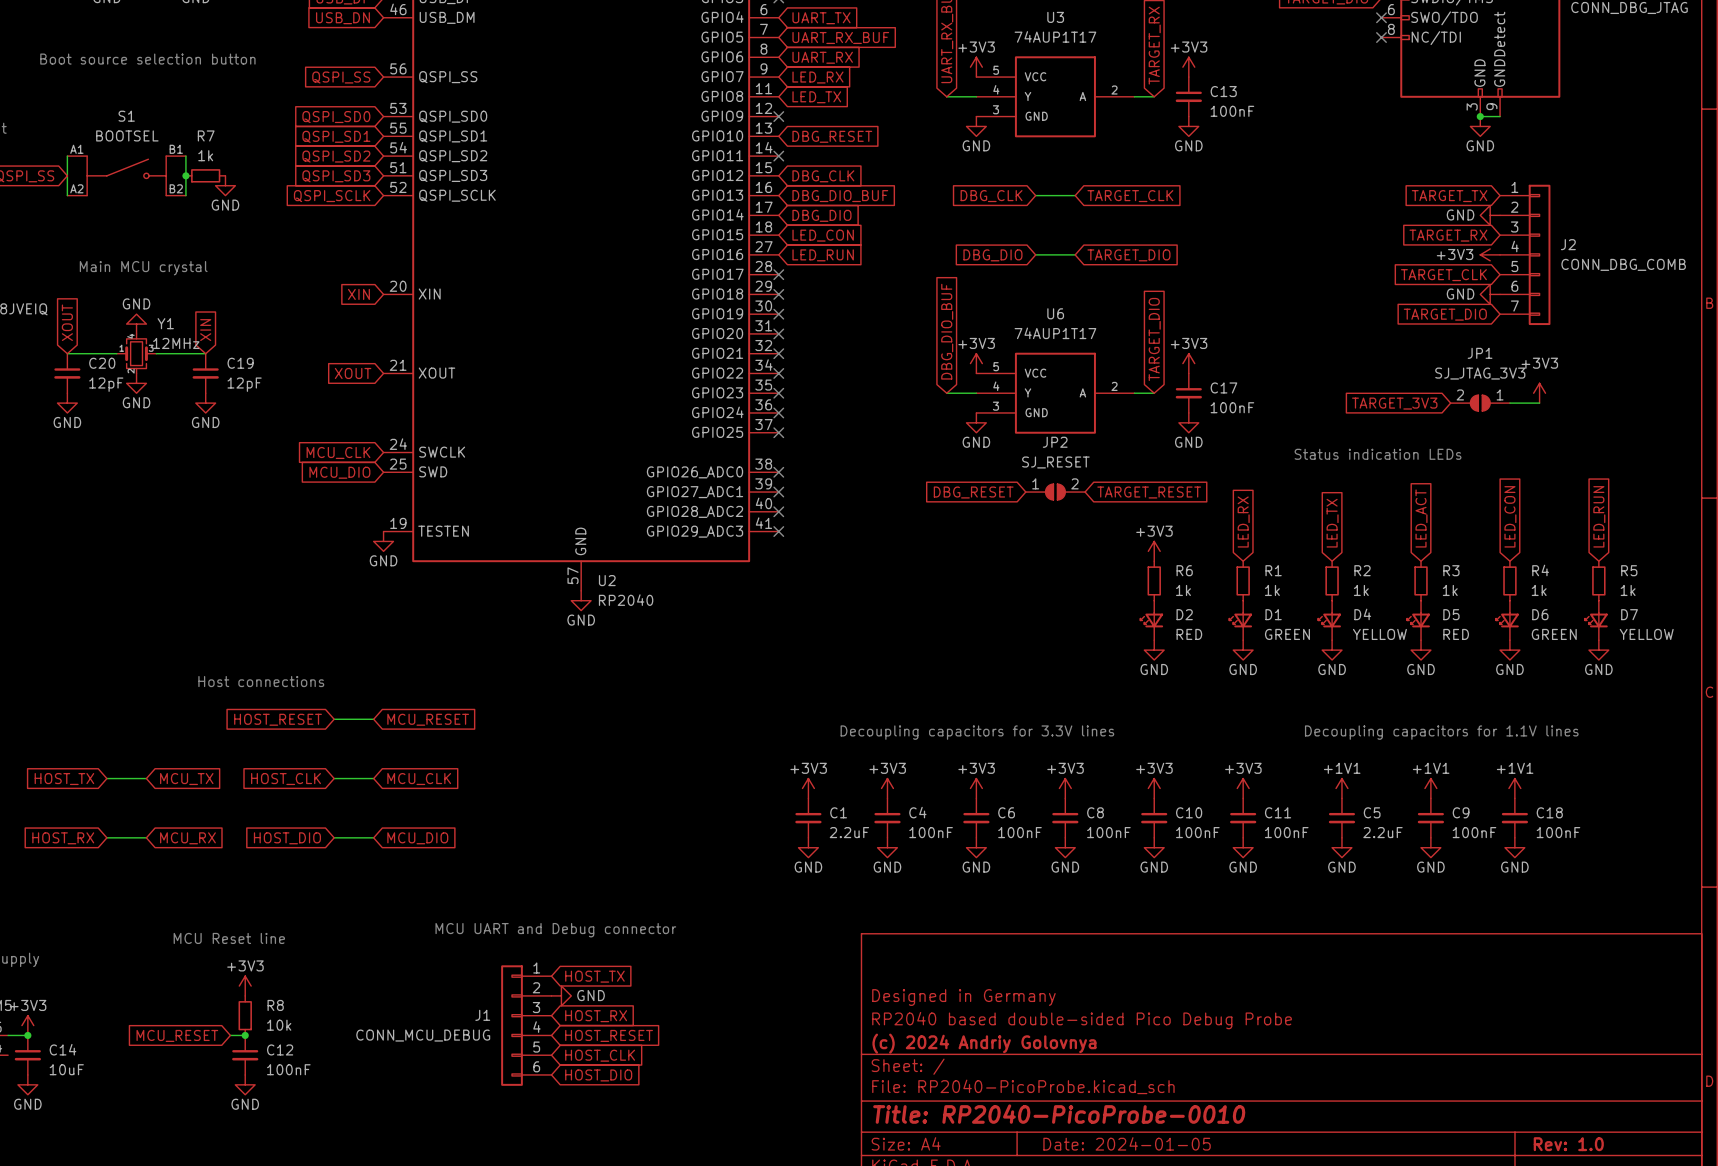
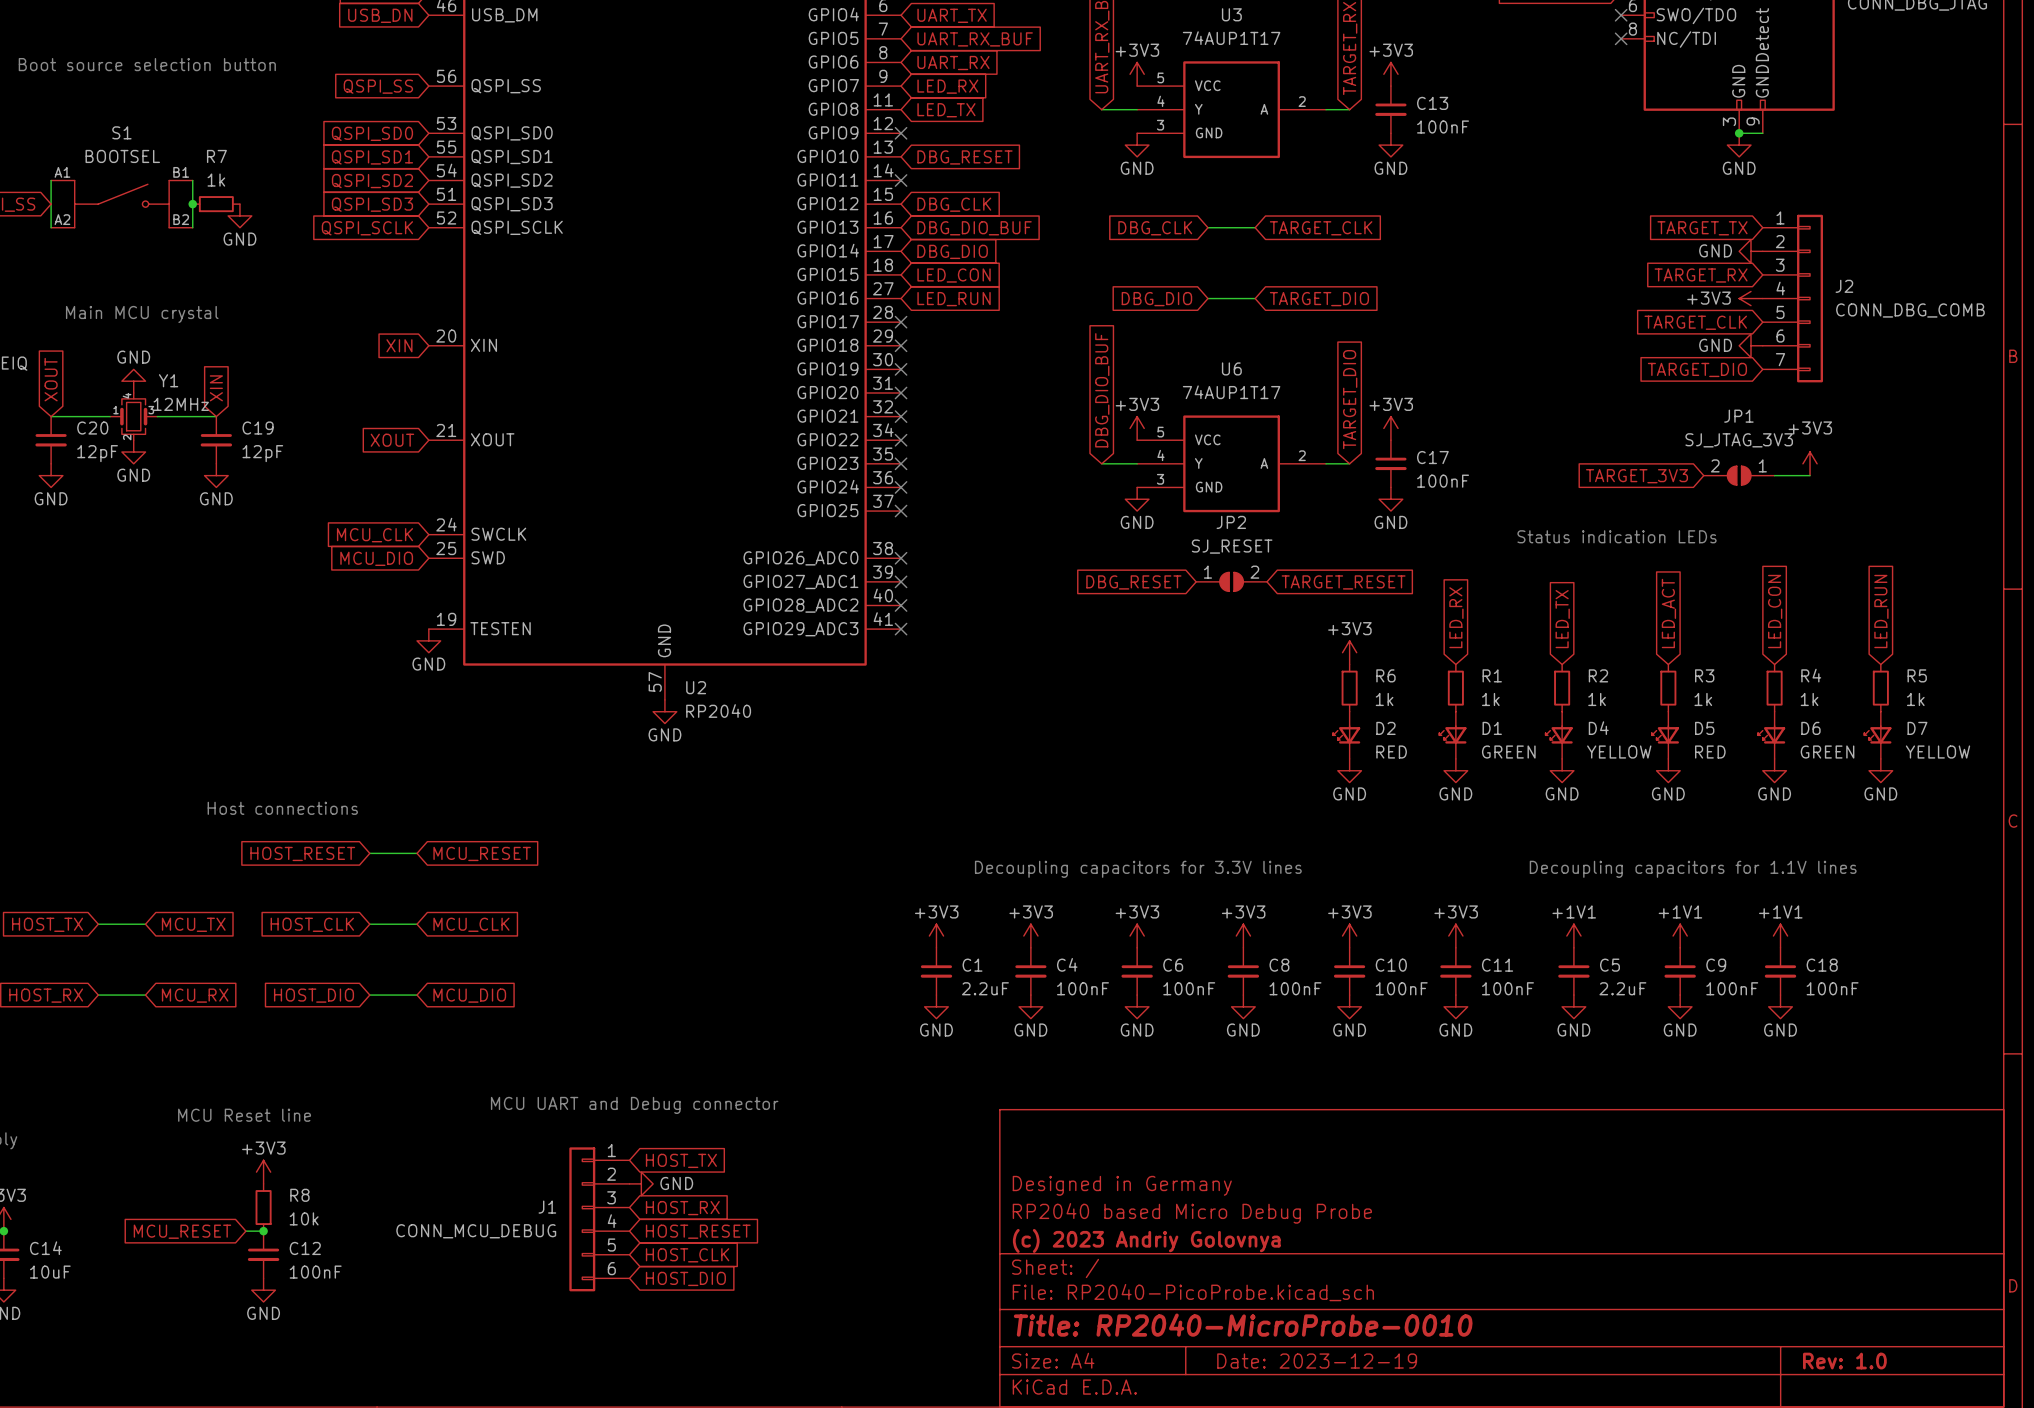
title block: RP2040 based double-sided Pico Debug Probe (1082, 1020) -> RP2040 based Micro Debug Probe (1192, 1213)
title block: (c) 2024 Andriy Golovnya (984, 1043) -> (c) 2023 Andriy Golovnya (1146, 1240)
title block: Title: RP2040-PicoProbe-0010 (1059, 1114) -> Title: RP2040-MicroProbe-0010 (1243, 1325)
title block: Date: 2024-01-05 (1127, 1143) -> Date: 2023-12-19 (1317, 1361)

